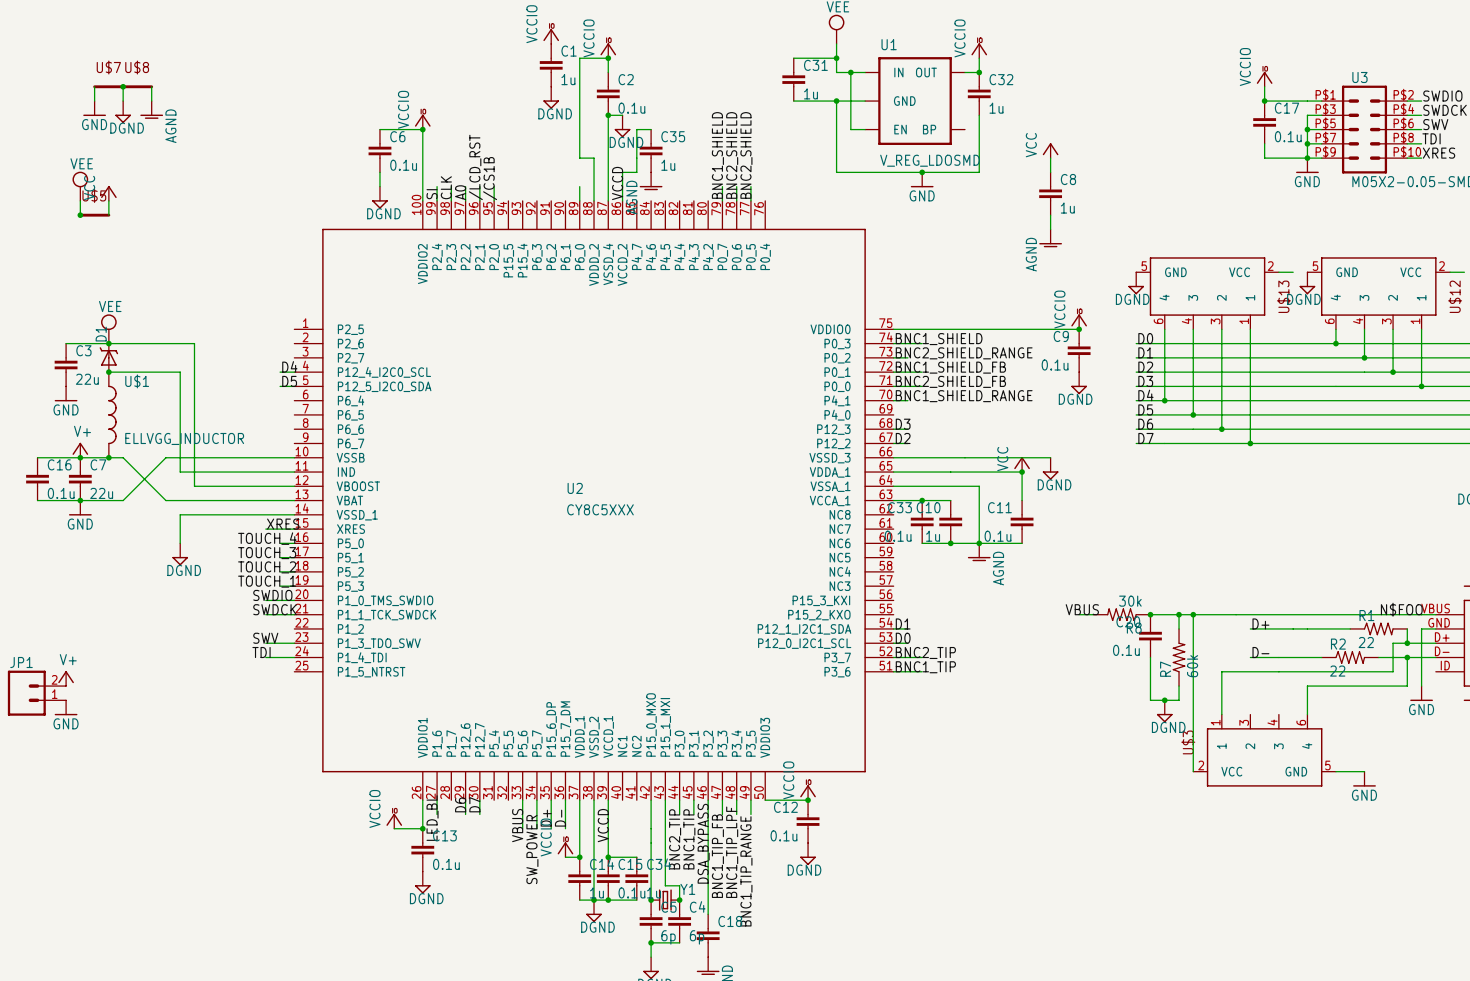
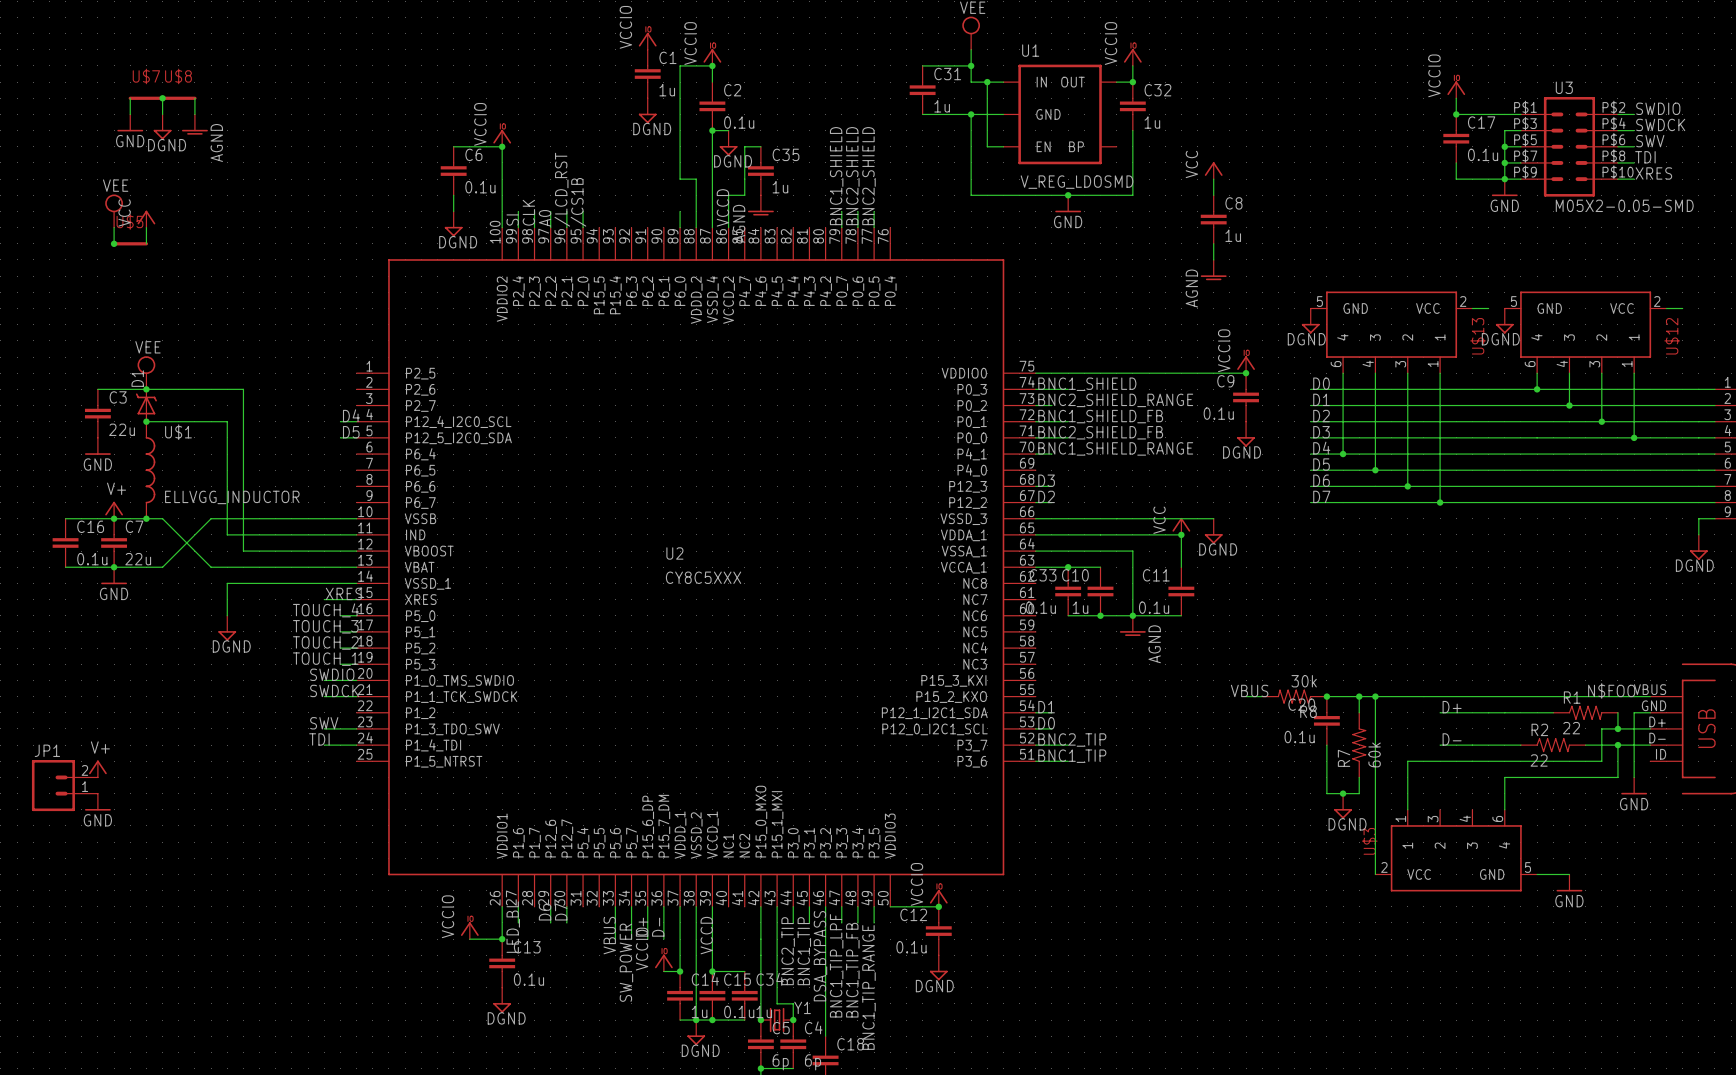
label: BNC1_TIP_LPF (732, 852) -> BNC1_TIP_FB (852, 970)
label: BNC1_TIP_FB (717, 856) -> BNC1_TIP_LPF (836, 965)

